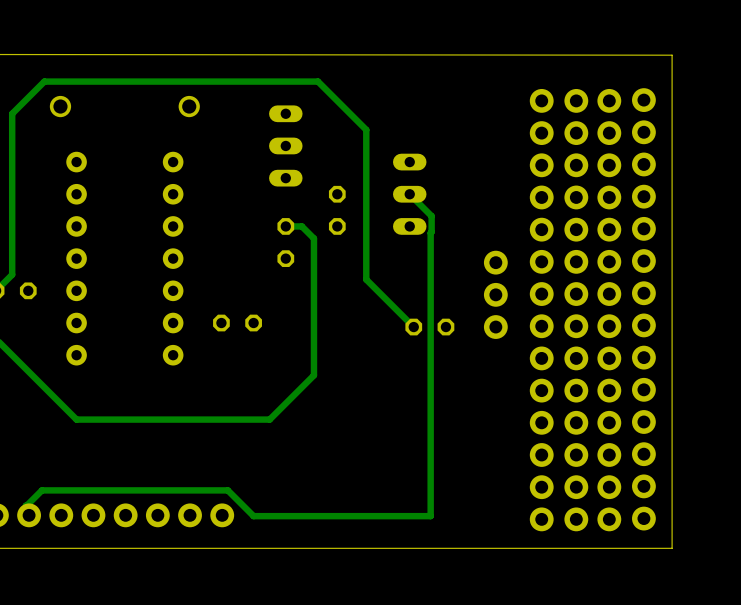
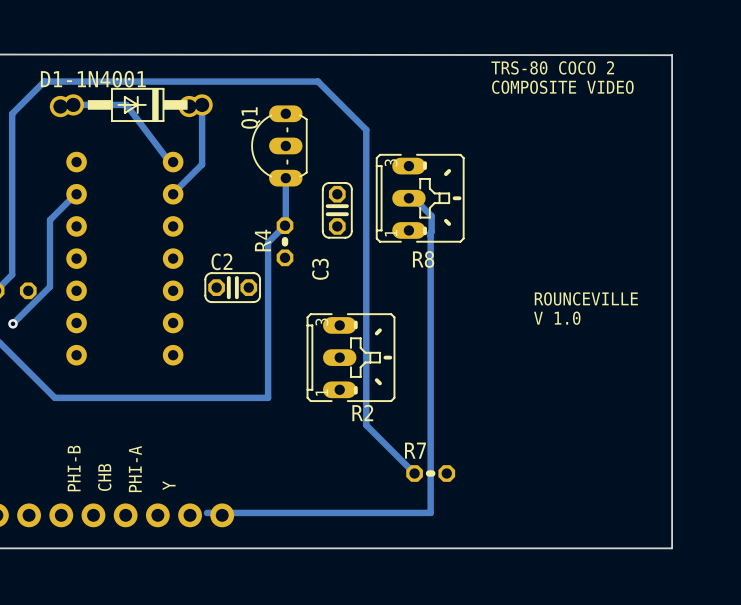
text: none -> TRS-80 COCO 2 (552, 67)
text: none -> COMPOSITE VIDEO (562, 87)
track: none -> (73, 104) (126, 104) (170, 163)
D1-1N4001: none -> (137, 104)
track: none -> (202, 104) (202, 164) (170, 195)
Q1 side: top (285, 145) -> bottom (279, 145)
R8 side: top (409, 194) -> bottom (420, 198)
track: none -> (74, 195) (50, 220) (50, 286) (12, 323)
C3 side: top (337, 210) -> bottom (337, 210)
track: (285, 226) (301, 226) (313, 238) (313, 375) (269, 419) (76, 419) (54, 397) -> (285, 178) (285, 224) (268, 242) (268, 397) (54, 397)
R4 side: top (285, 242) -> bottom (285, 241)
track: (366, 279) (413, 327) -> (366, 279) (366, 425) (414, 473)
part: (495, 294) -> none
text: none -> ROUNCEVILLE (586, 298)
part: (643, 309) -> none
part: (541, 310) -> none
part: (576, 310) -> none
part: (609, 310) -> none
text: none -> V 1.0 (557, 318)
via: none -> (12, 323)
C2 side: top (237, 323) -> bottom (232, 287)
R7 side: top (429, 327) -> bottom (430, 473)
R2: none -> (350, 357)
text: none -> PHI-B (74, 468)
text: none -> PHI-A (135, 469)
text: none -> CHB (104, 477)
text: none -> Y (169, 485)
track: (430, 512) (430, 516) (253, 516) (227, 490) (41, 490) (25, 505) (25, 512) (29, 515) -> (430, 512) (207, 512)

